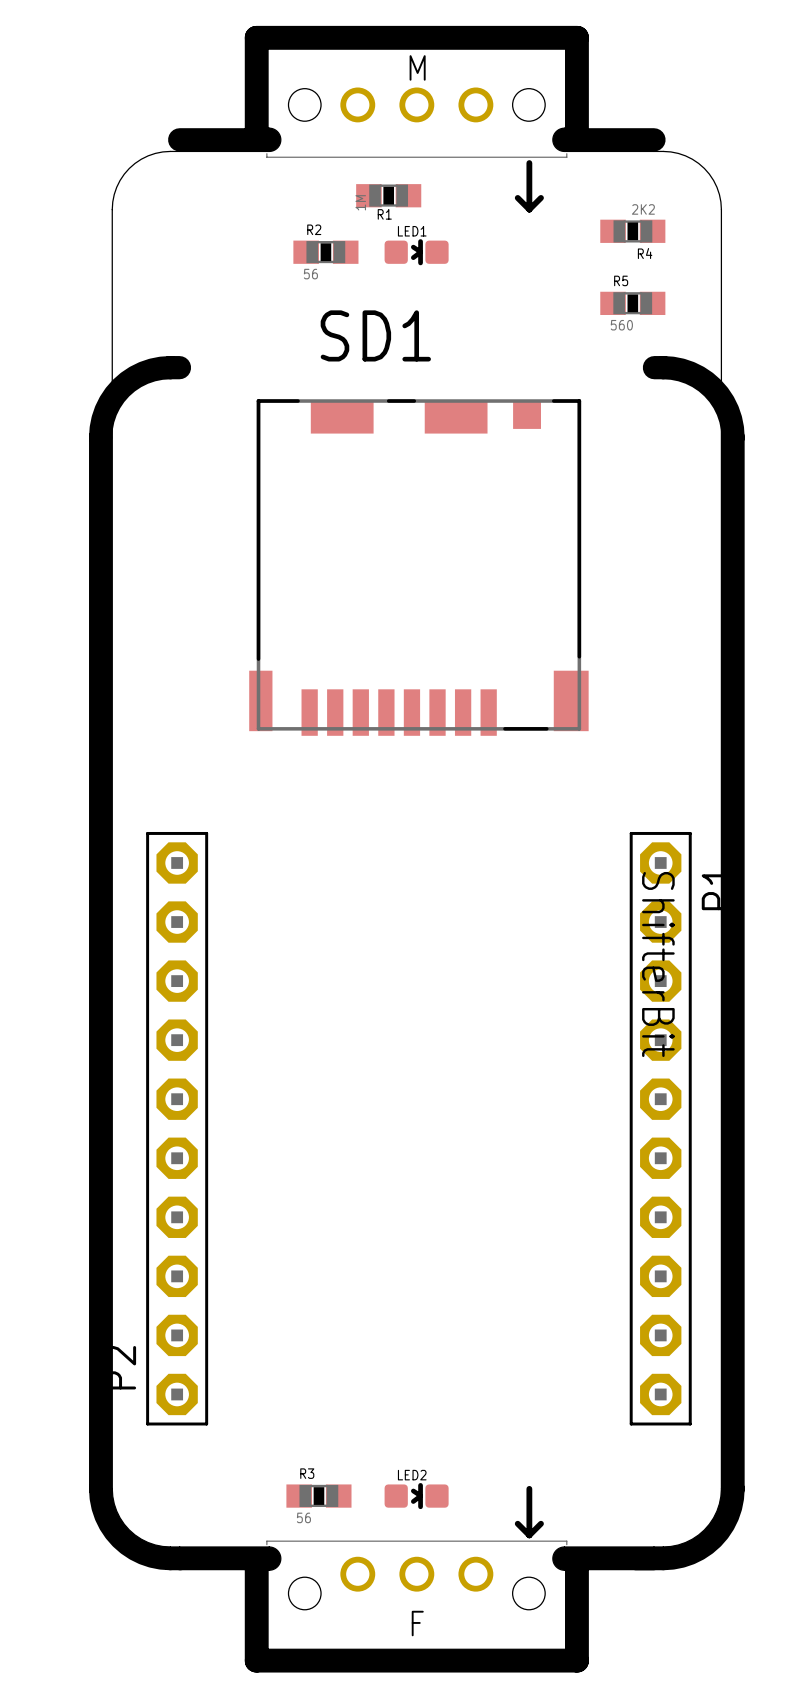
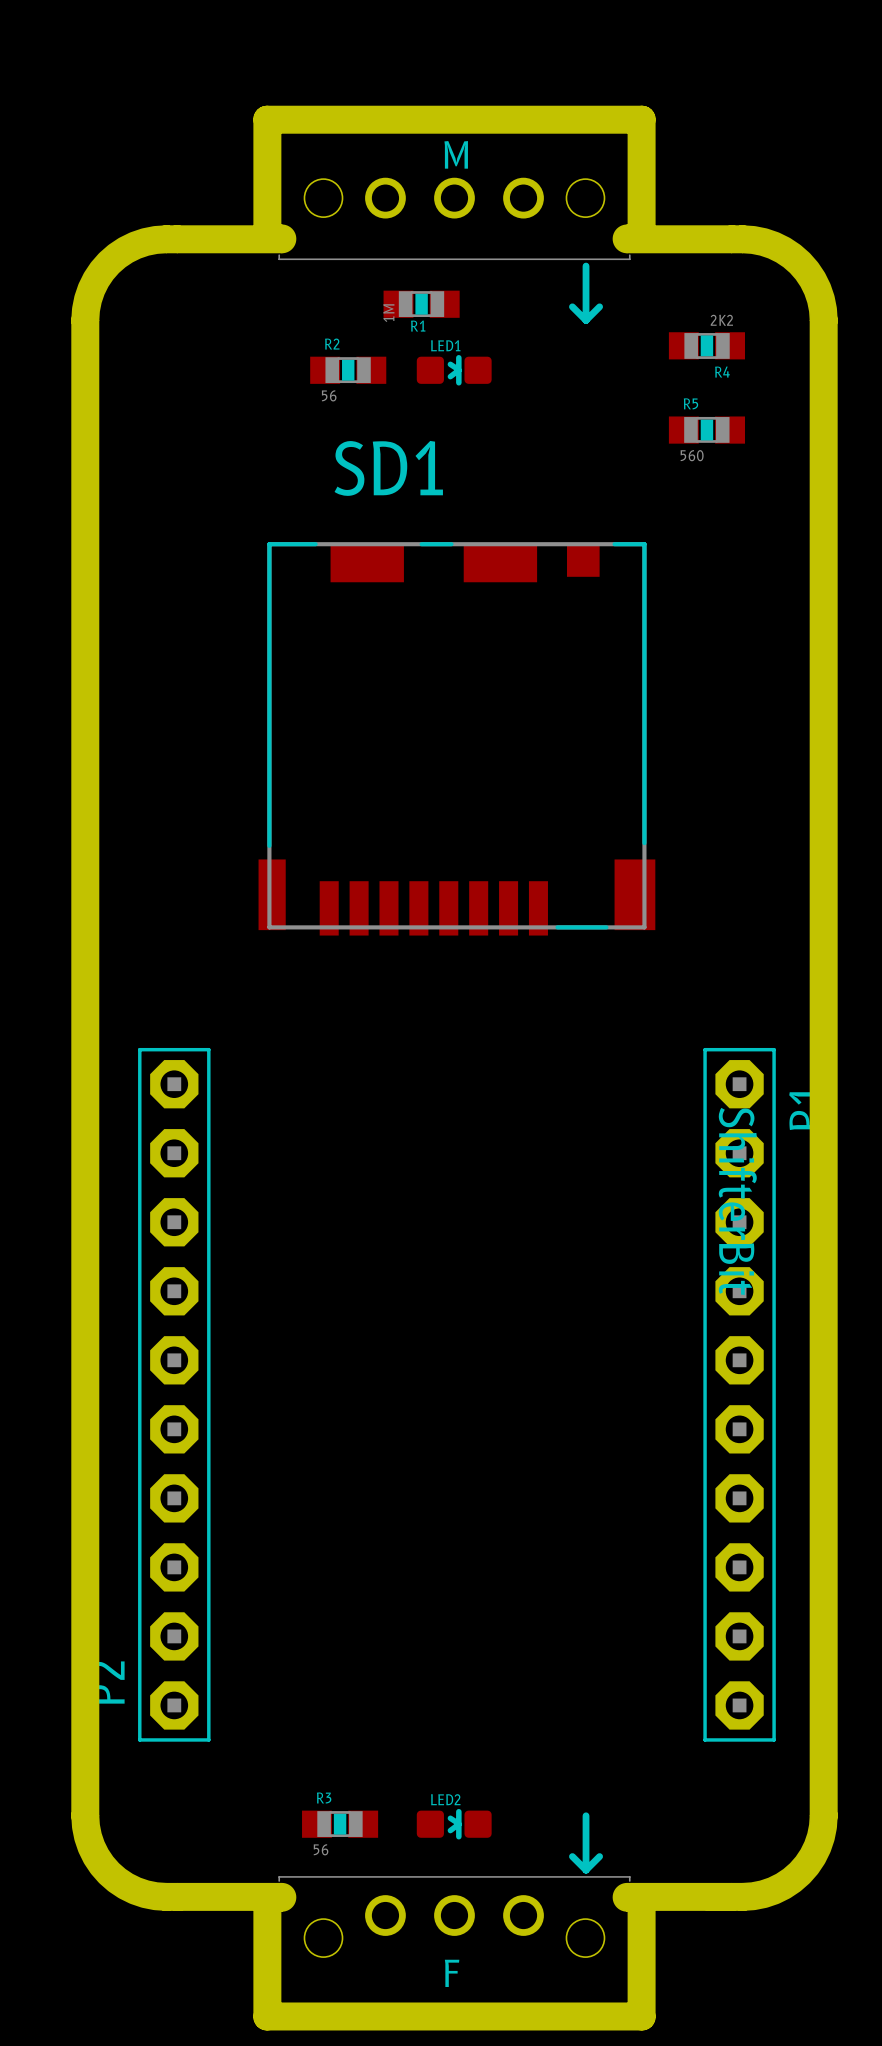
board edge: (179, 367) (161, 368) (143, 372) (121, 388) (105, 410) (100, 437) -> (177, 238) (145, 241) (116, 255) (101, 270) (87, 299) (84, 320) (84, 586)
board edge: (654, 367) (672, 368) (689, 372) (712, 388) (727, 410) (733, 437) -> (732, 238) (763, 241) (792, 255) (807, 270) (821, 299) (824, 320) (824, 586)

